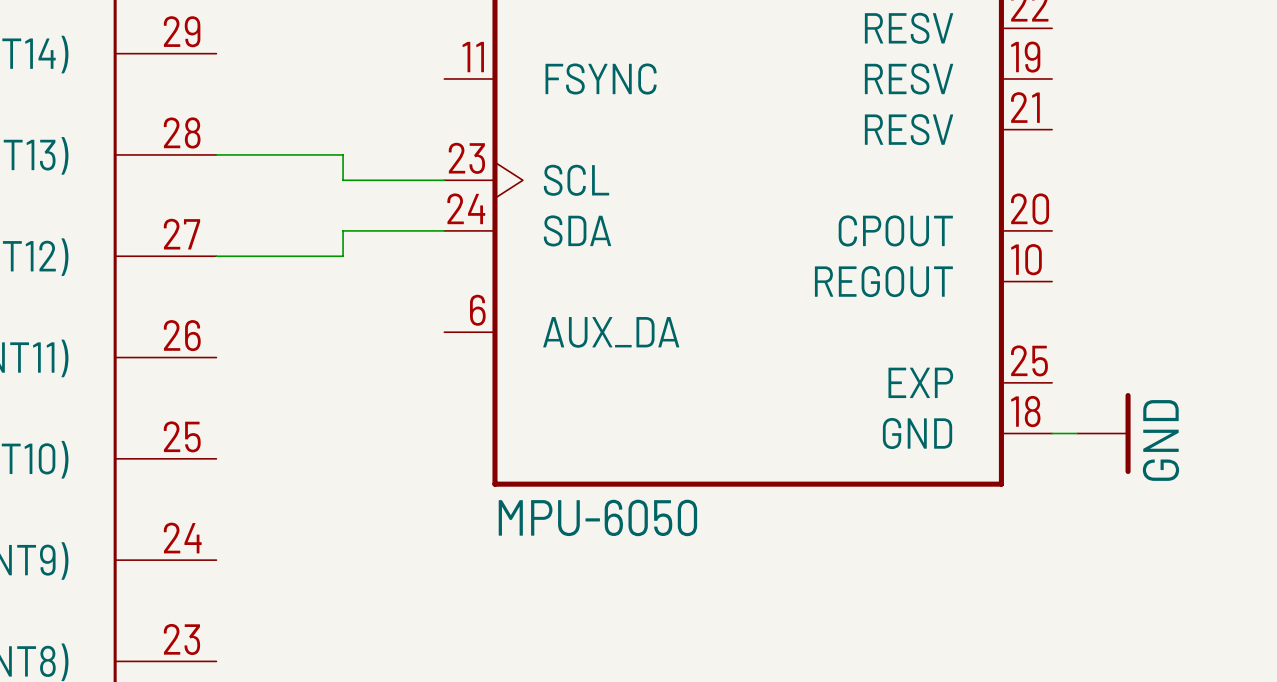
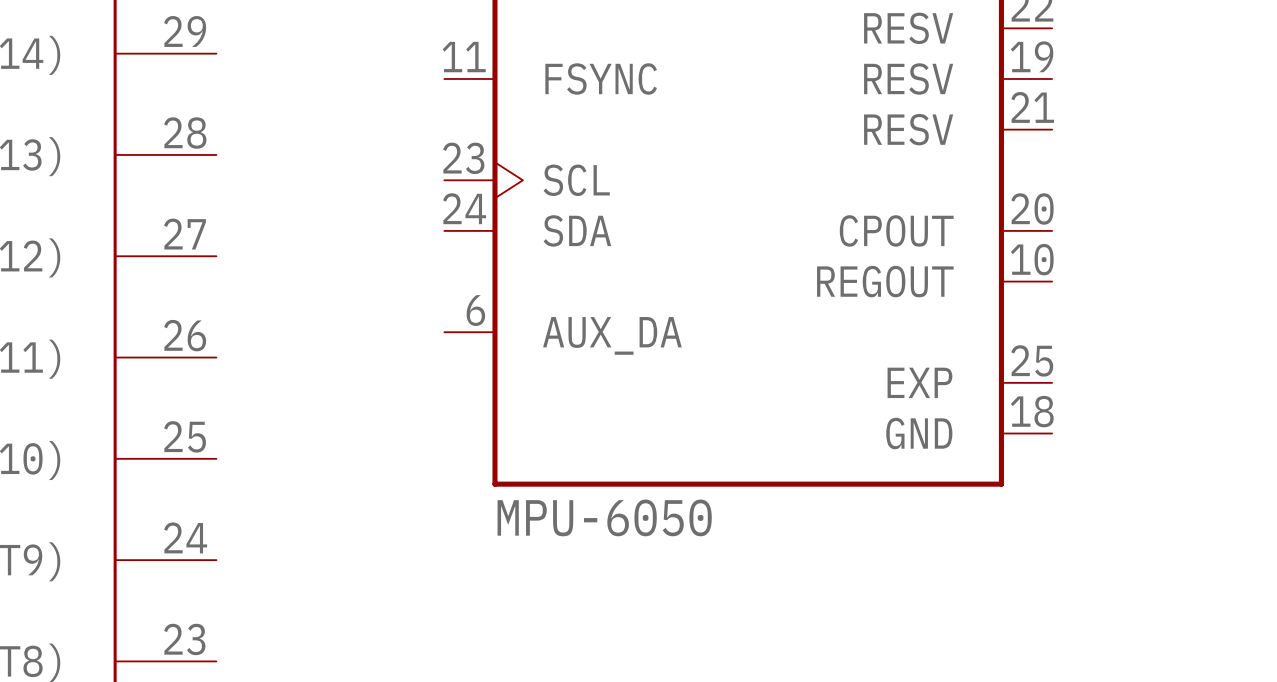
wire: (216, 154) (343, 154) (343, 180) (444, 180) -> none
wire: (444, 230) (343, 230) (343, 256) (216, 256) -> none
wire: (1052, 433) (1077, 433) -> none
power symbol: GND (1103, 433) -> none

